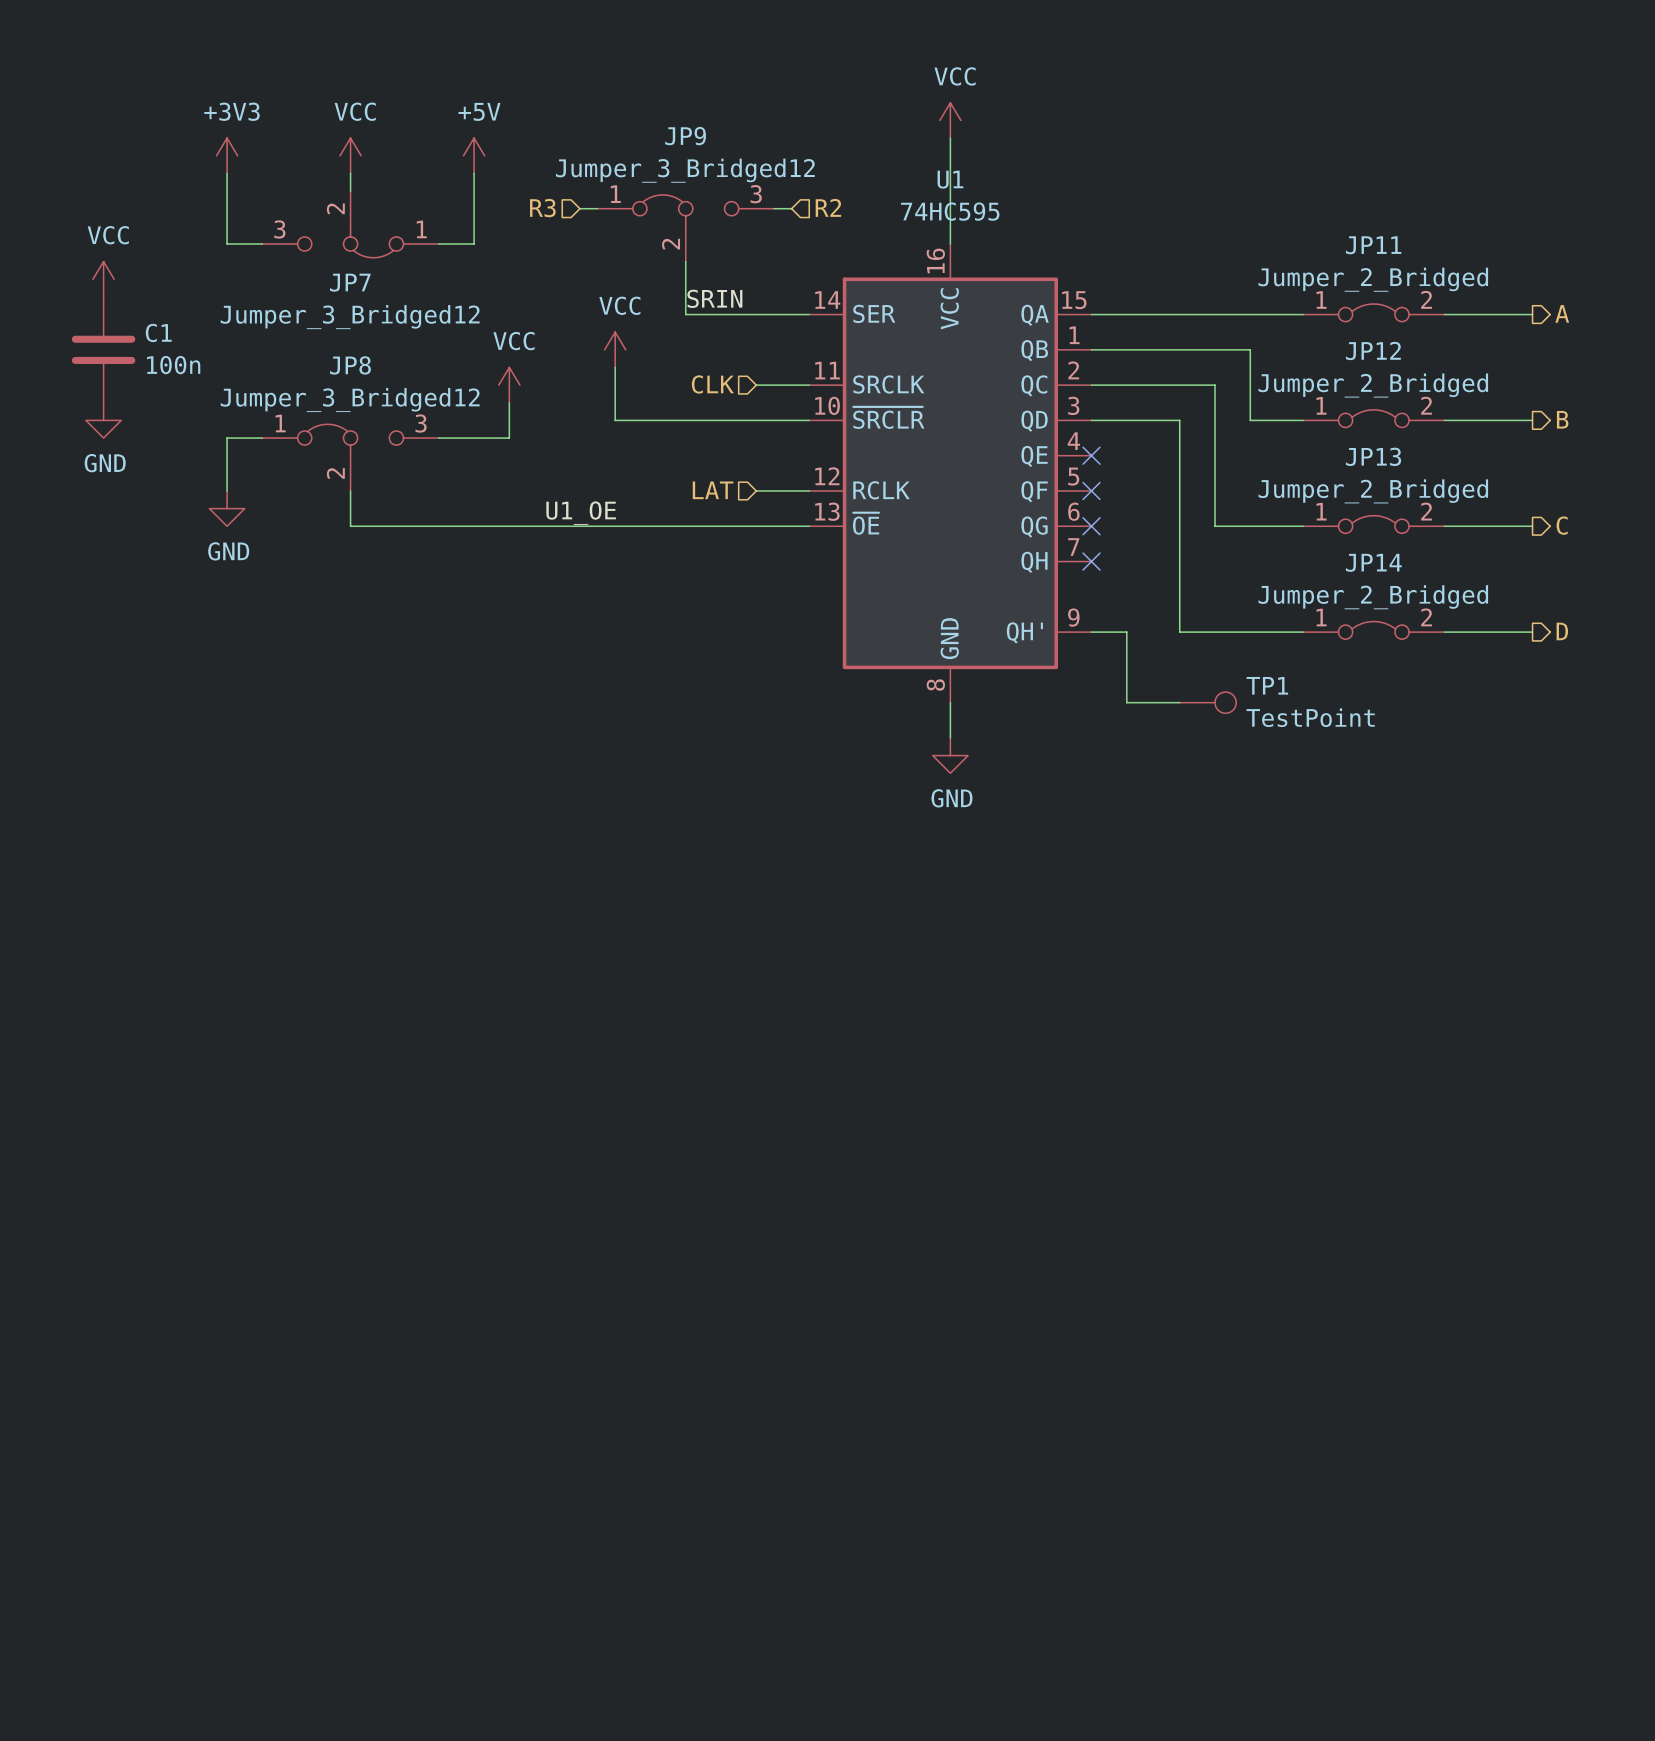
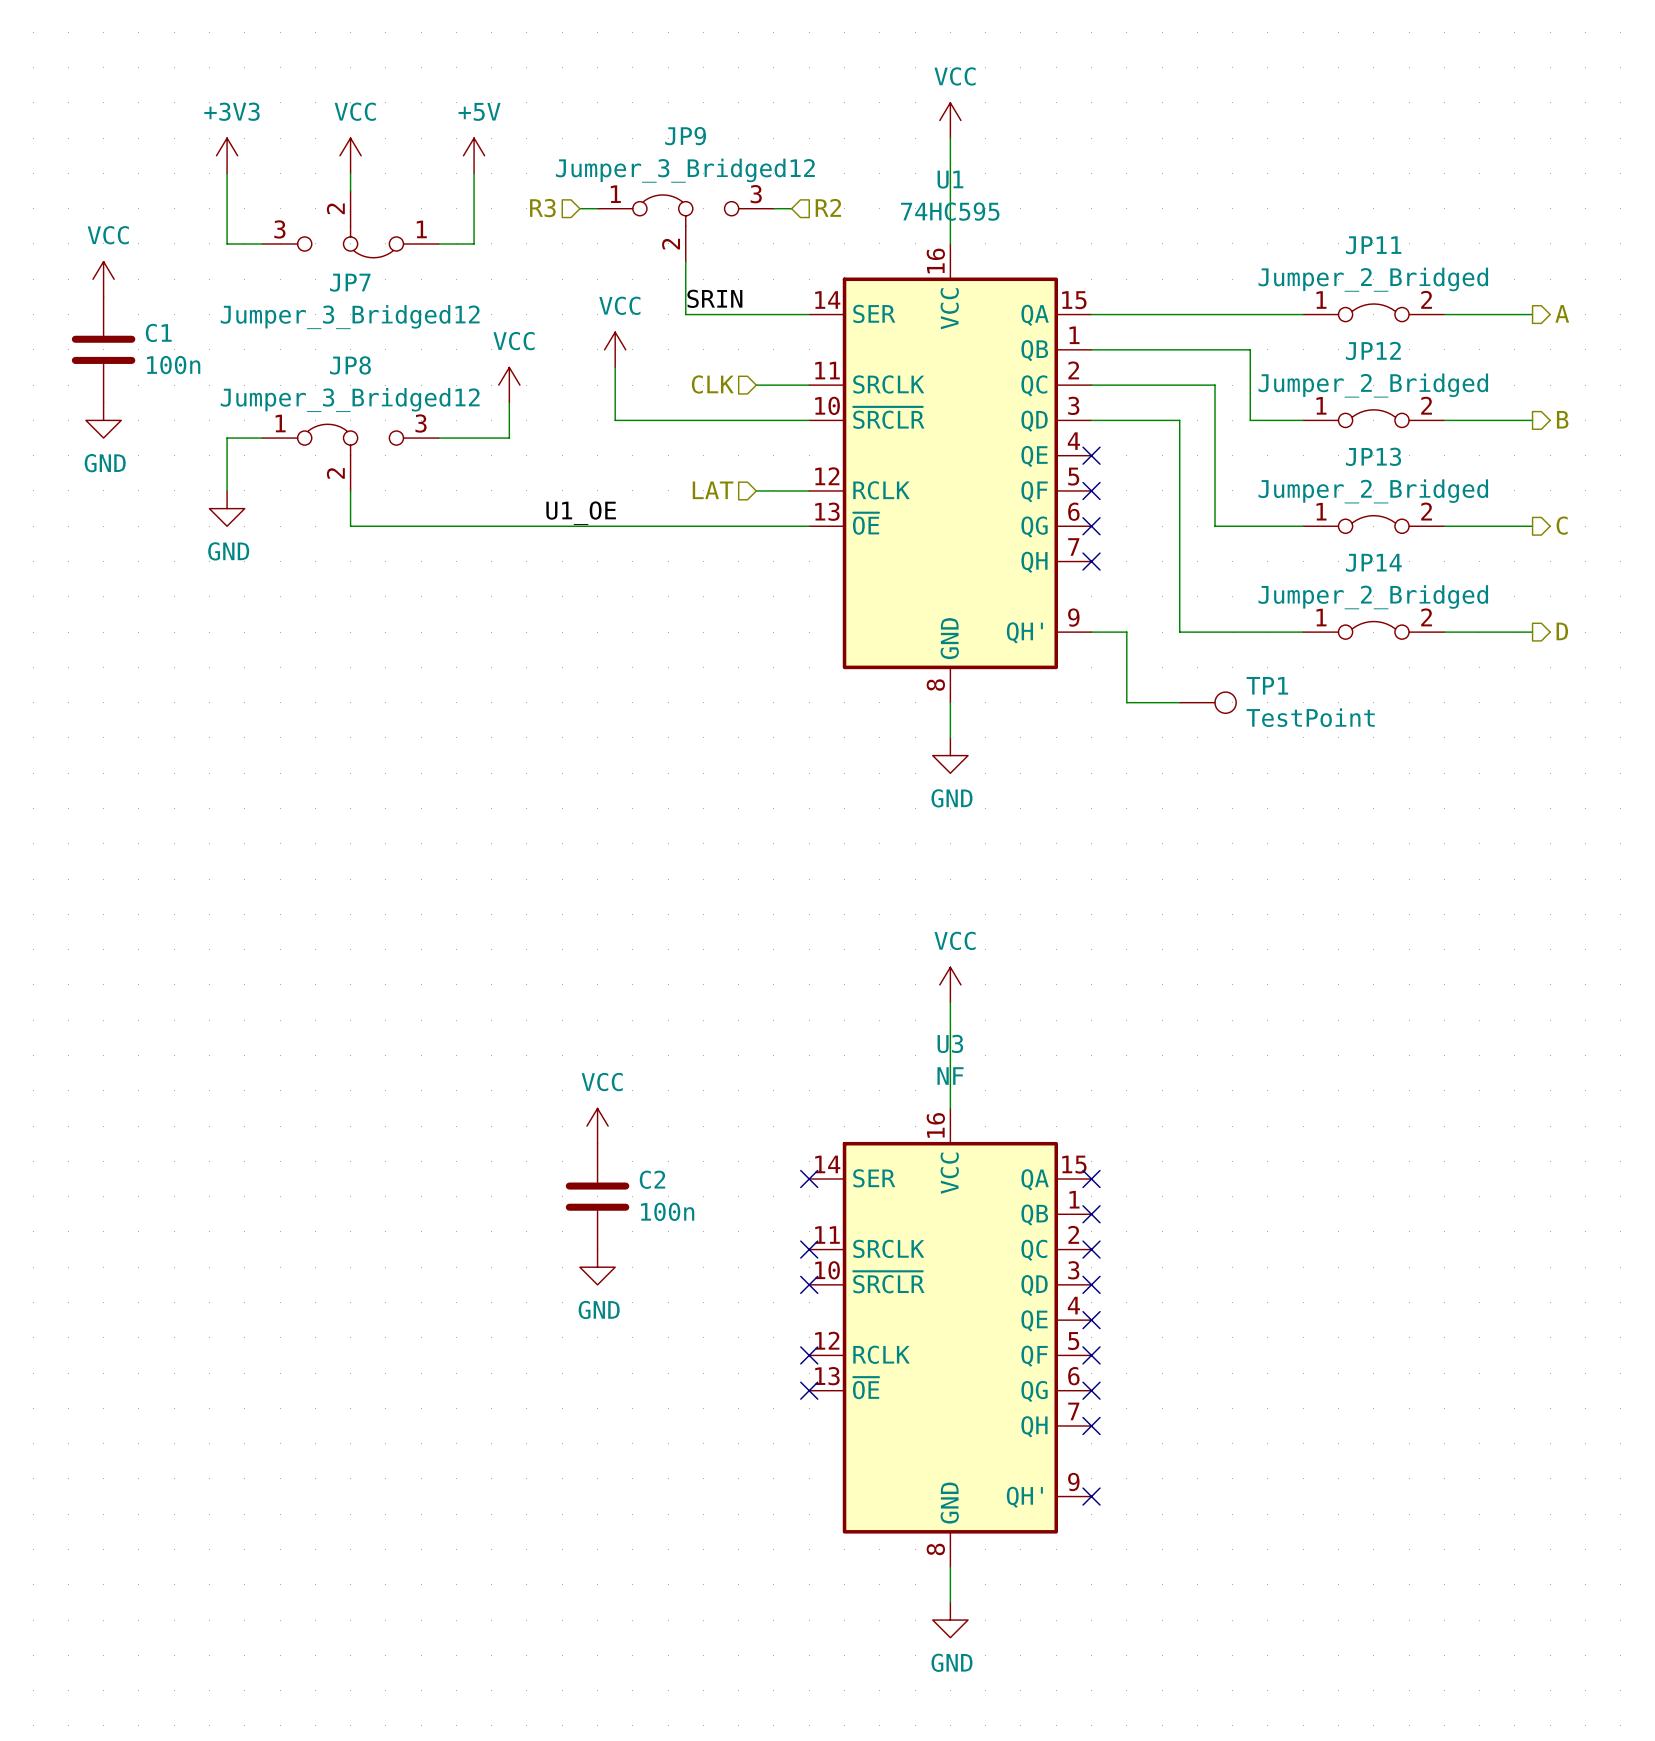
power symbol: none -> VCC (950, 984)
wire: none -> (950, 1002) (950, 1108)
power symbol: none -> VCC (597, 1126)
no-connect mark: none -> (809, 1179)
no-connect mark: none -> (1091, 1179)
C2: none -> 100n (597, 1196)
no-connect mark: none -> (1091, 1214)
no-connect mark: none -> (809, 1249)
no-connect mark: none -> (1091, 1249)
power symbol: none -> GND (597, 1267)
no-connect mark: none -> (809, 1284)
no-connect mark: none -> (1091, 1284)
no-connect mark: none -> (1091, 1320)
U3: none -> NF (950, 1337)
no-connect mark: none -> (809, 1355)
no-connect mark: none -> (1091, 1355)
no-connect mark: none -> (809, 1390)
no-connect mark: none -> (1091, 1390)
no-connect mark: none -> (1091, 1425)
no-connect mark: none -> (1091, 1496)
wire: none -> (950, 1567) (950, 1602)
power symbol: none -> GND (950, 1620)

